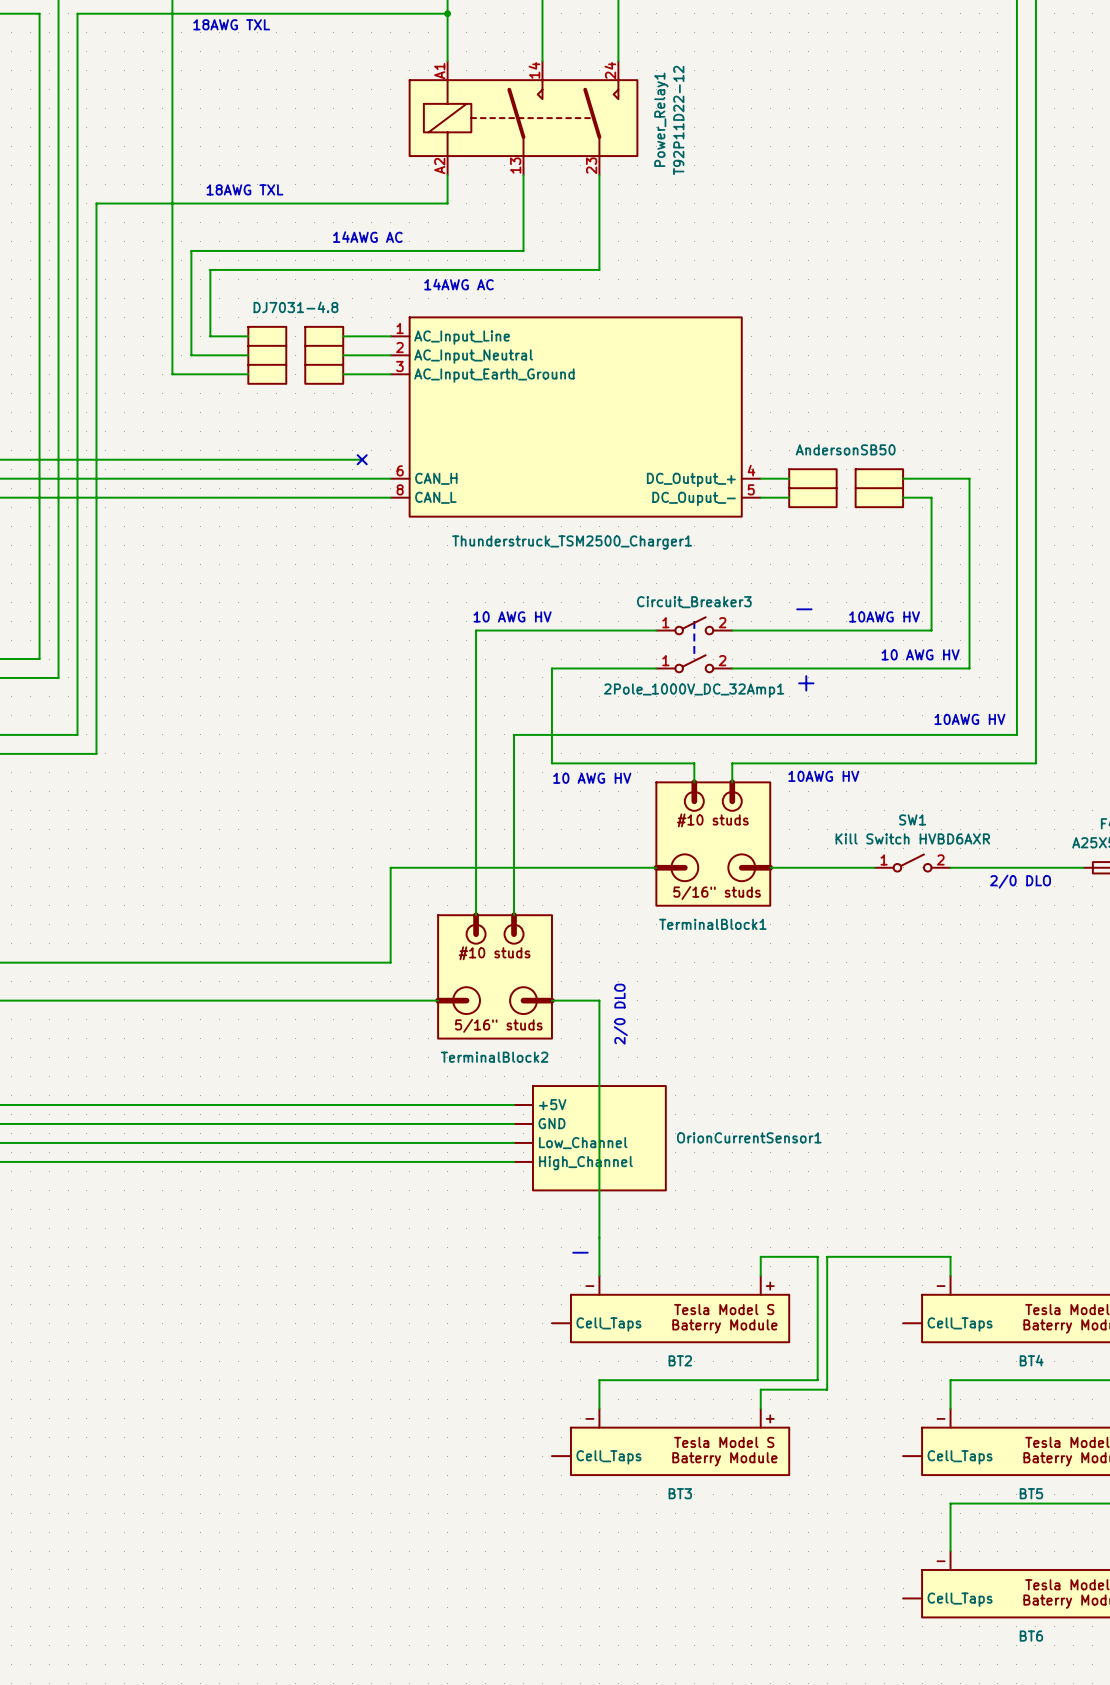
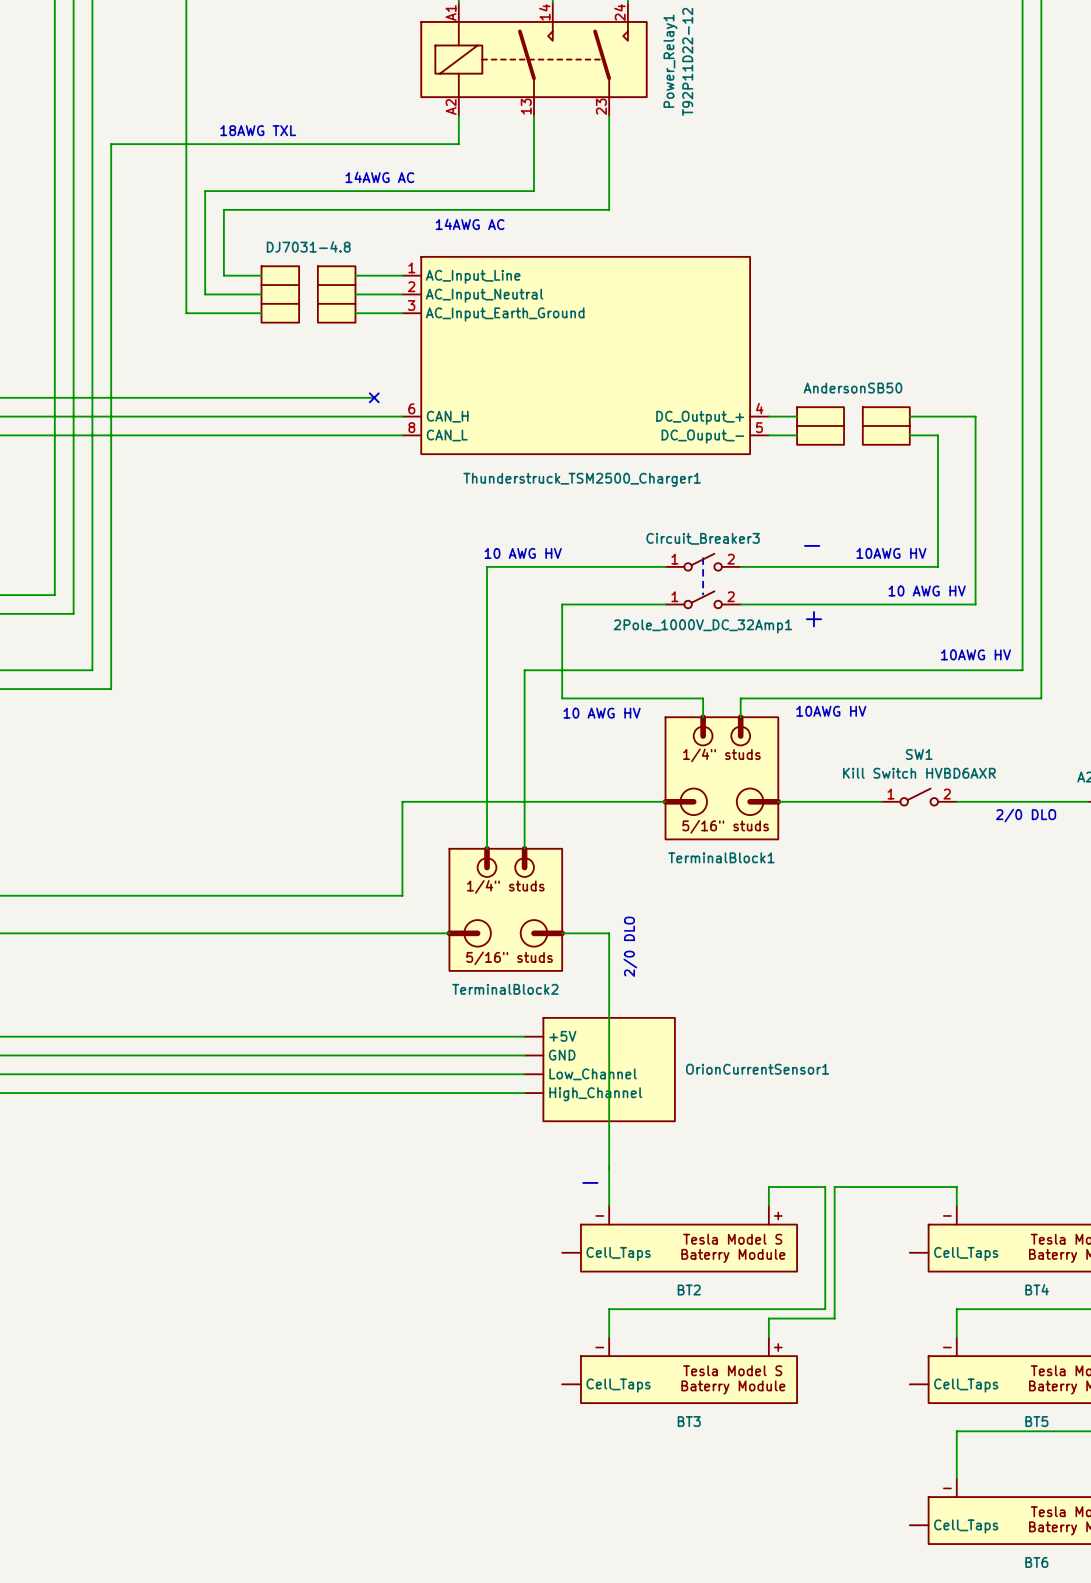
TerminalBlock1 text: #10 studs (712, 820) -> 1/4" studs (721, 755)
TerminalBlock2 text: #10 studs (494, 953) -> 1/4" studs (505, 886)

